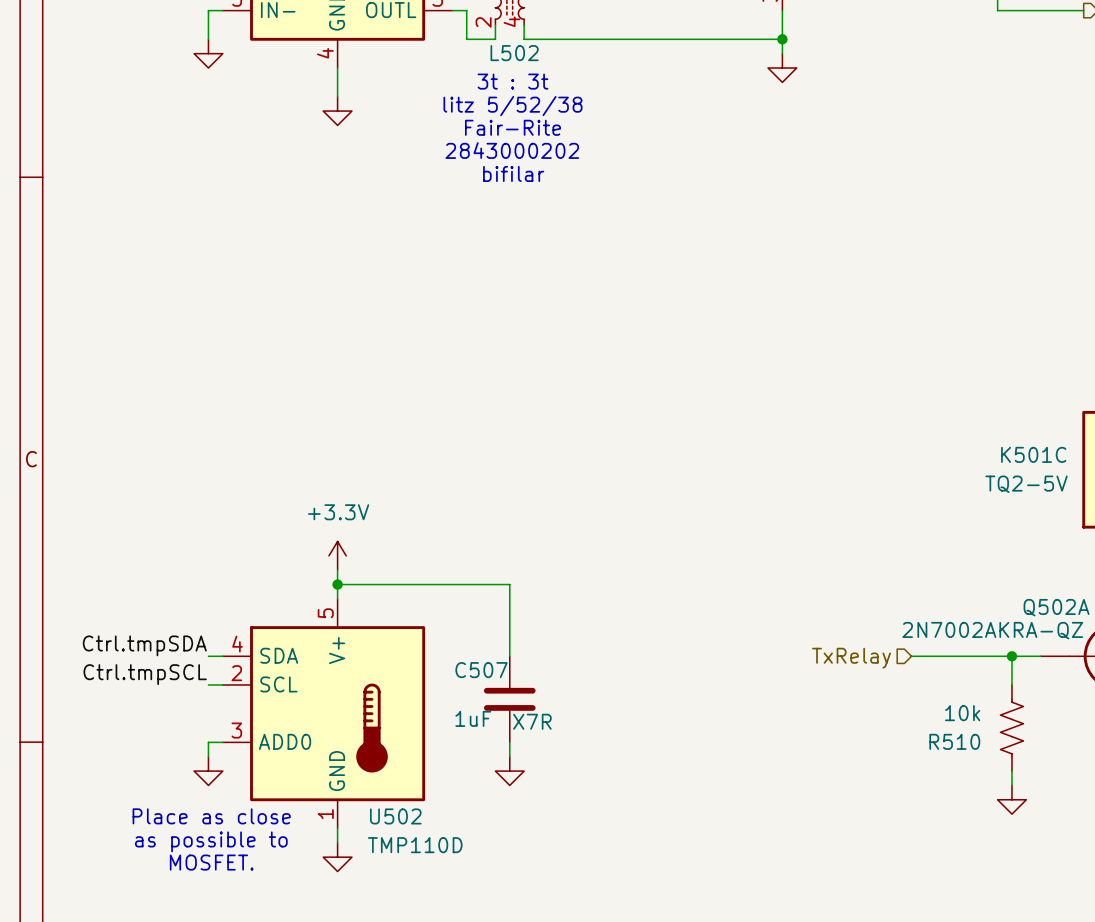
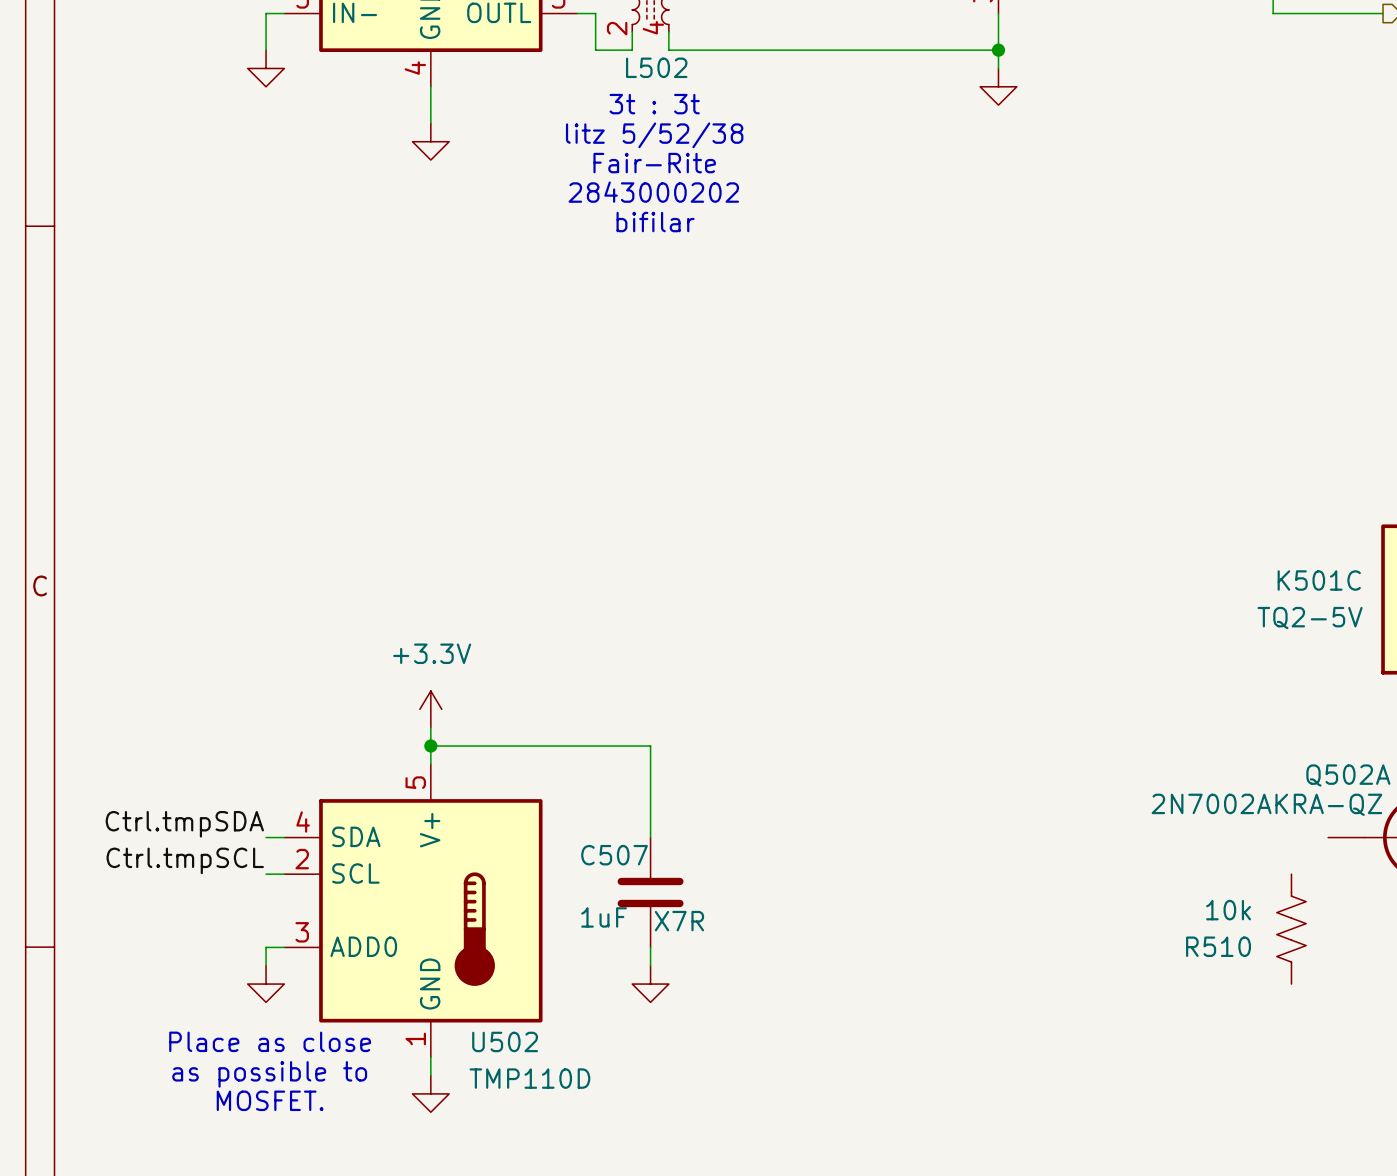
wire: (911, 656) (1040, 656) -> none
wire: (1011, 656) (1011, 684) -> none
junction: (1011, 656) -> none
hierarchical label: TxRelay (851, 658) -> none
wire: (1011, 771) (1011, 785) -> none
power symbol: (1011, 799) -> none

